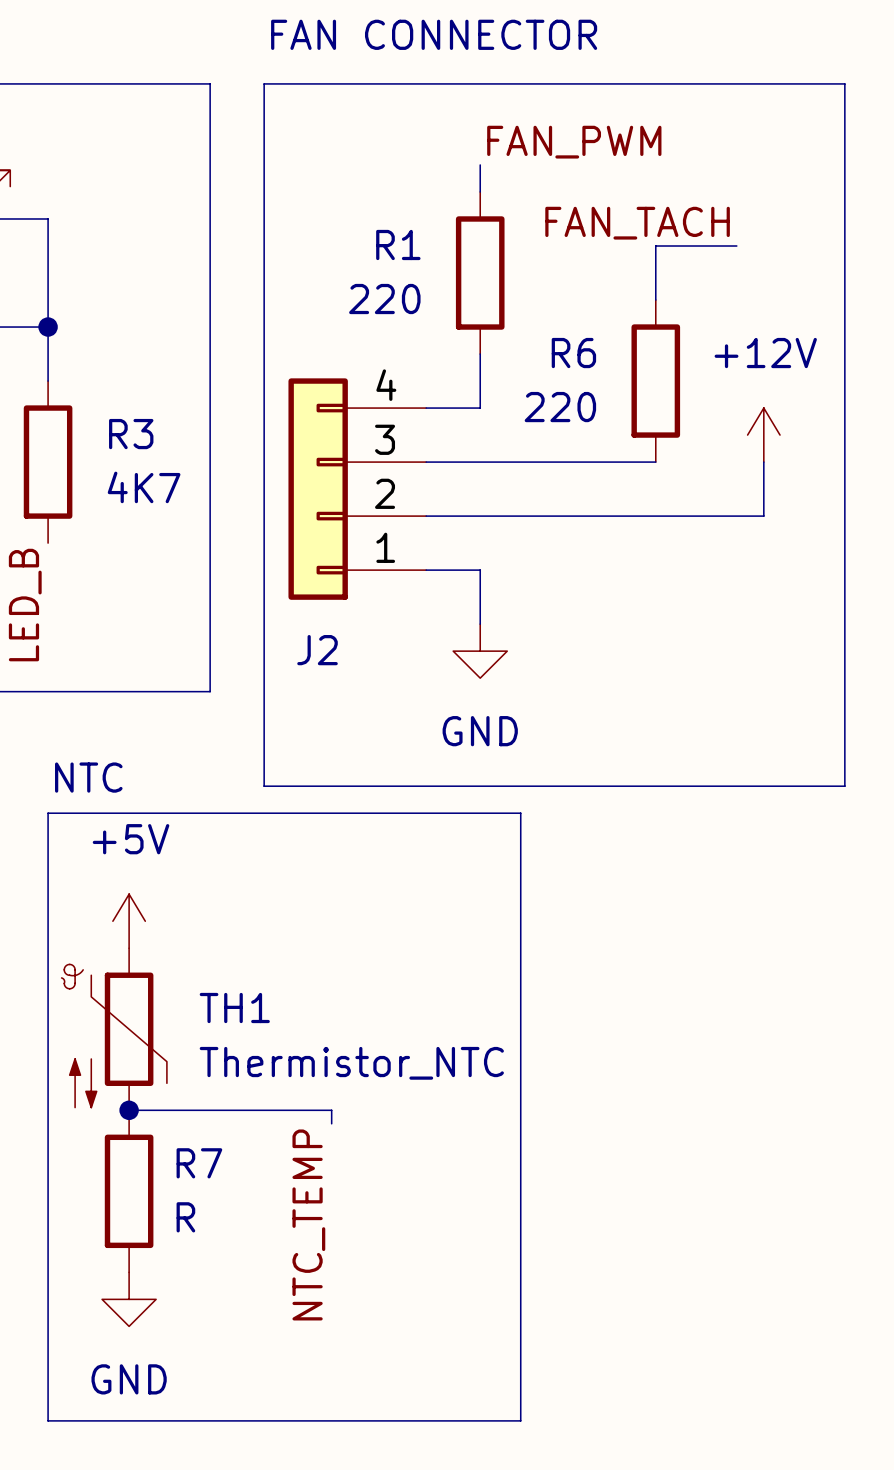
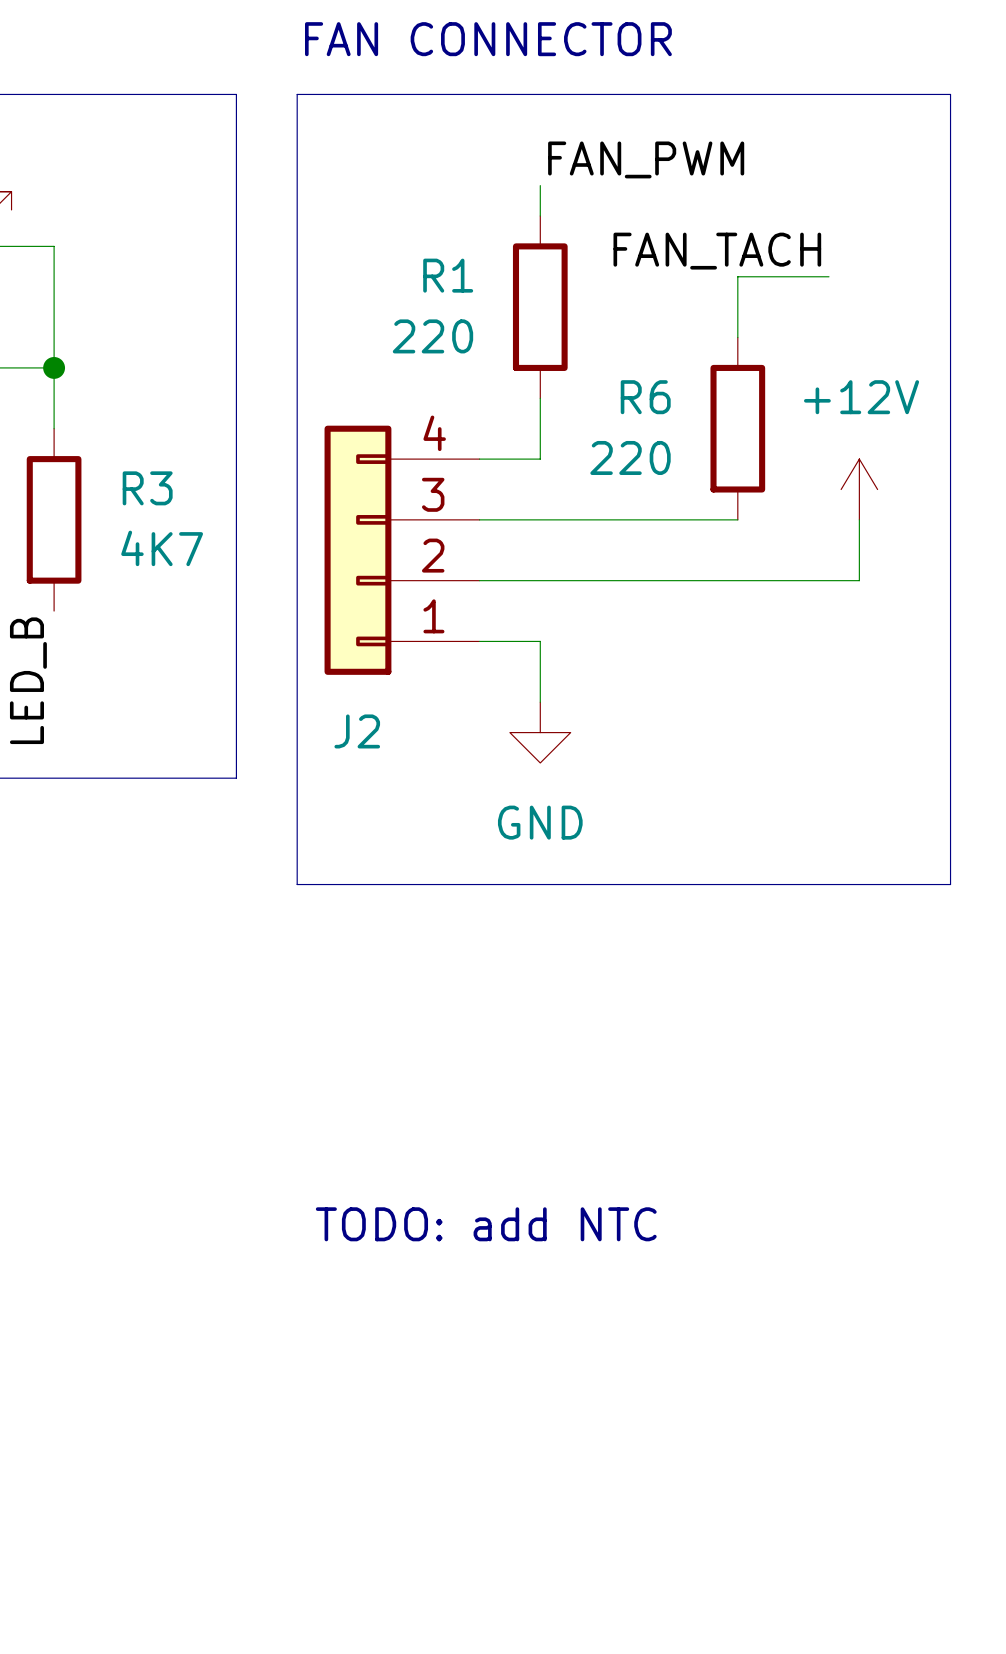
text: NTC (88, 777) -> none
line: (48, 813) (520, 813) (520, 1420) (48, 1420) (48, 813) -> none
power symbol: +5V (129, 921) -> none
TH1: Thermistor_NTC (114, 1029) -> none
text: none -> TODO: add NTC (486, 1224)
wire: (129, 1110) (331, 1110) (331, 1123) -> none
junction: (129, 1110) -> none
R7: R (129, 1191) -> none
label: NTC_TEMP (308, 1224) -> none
power symbol: GND (129, 1299) -> none

